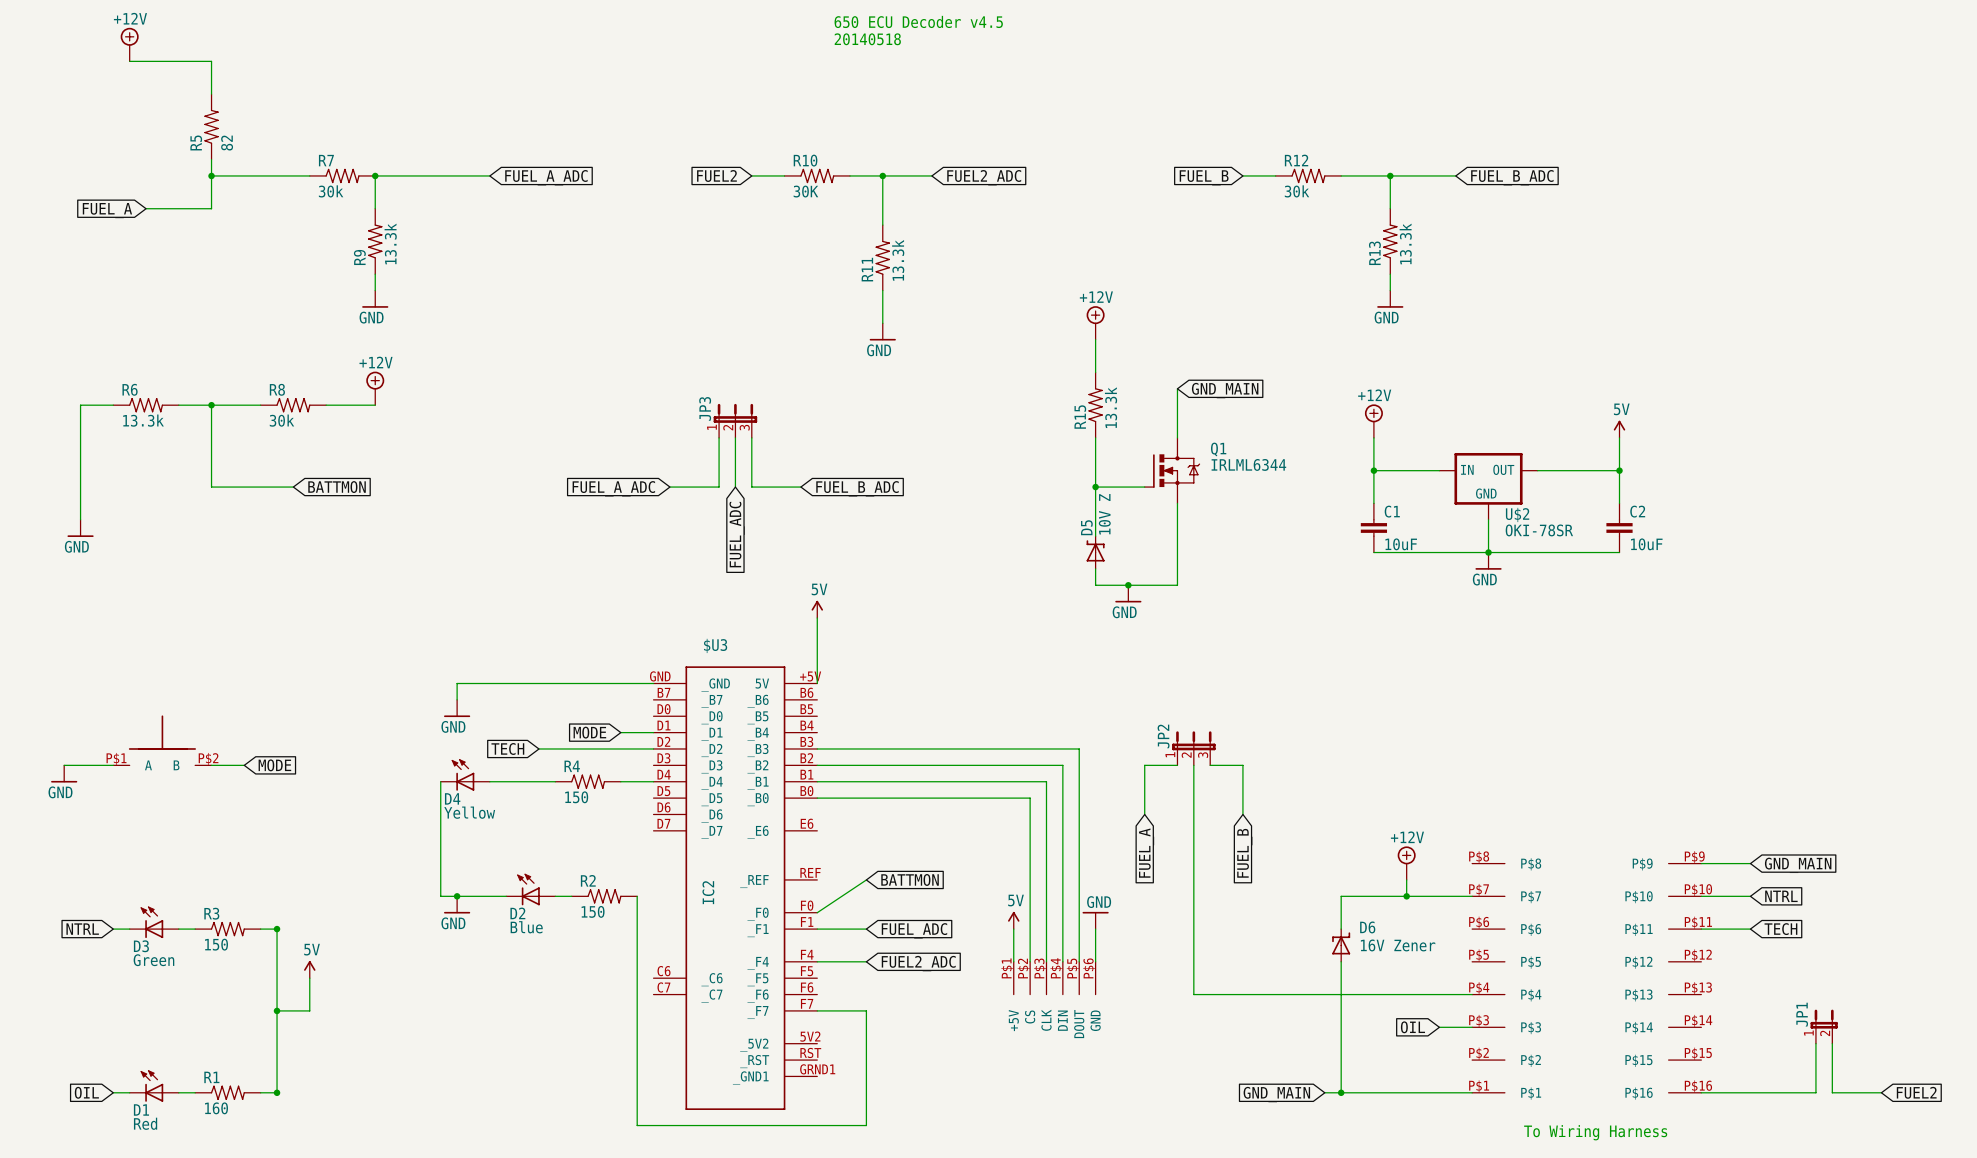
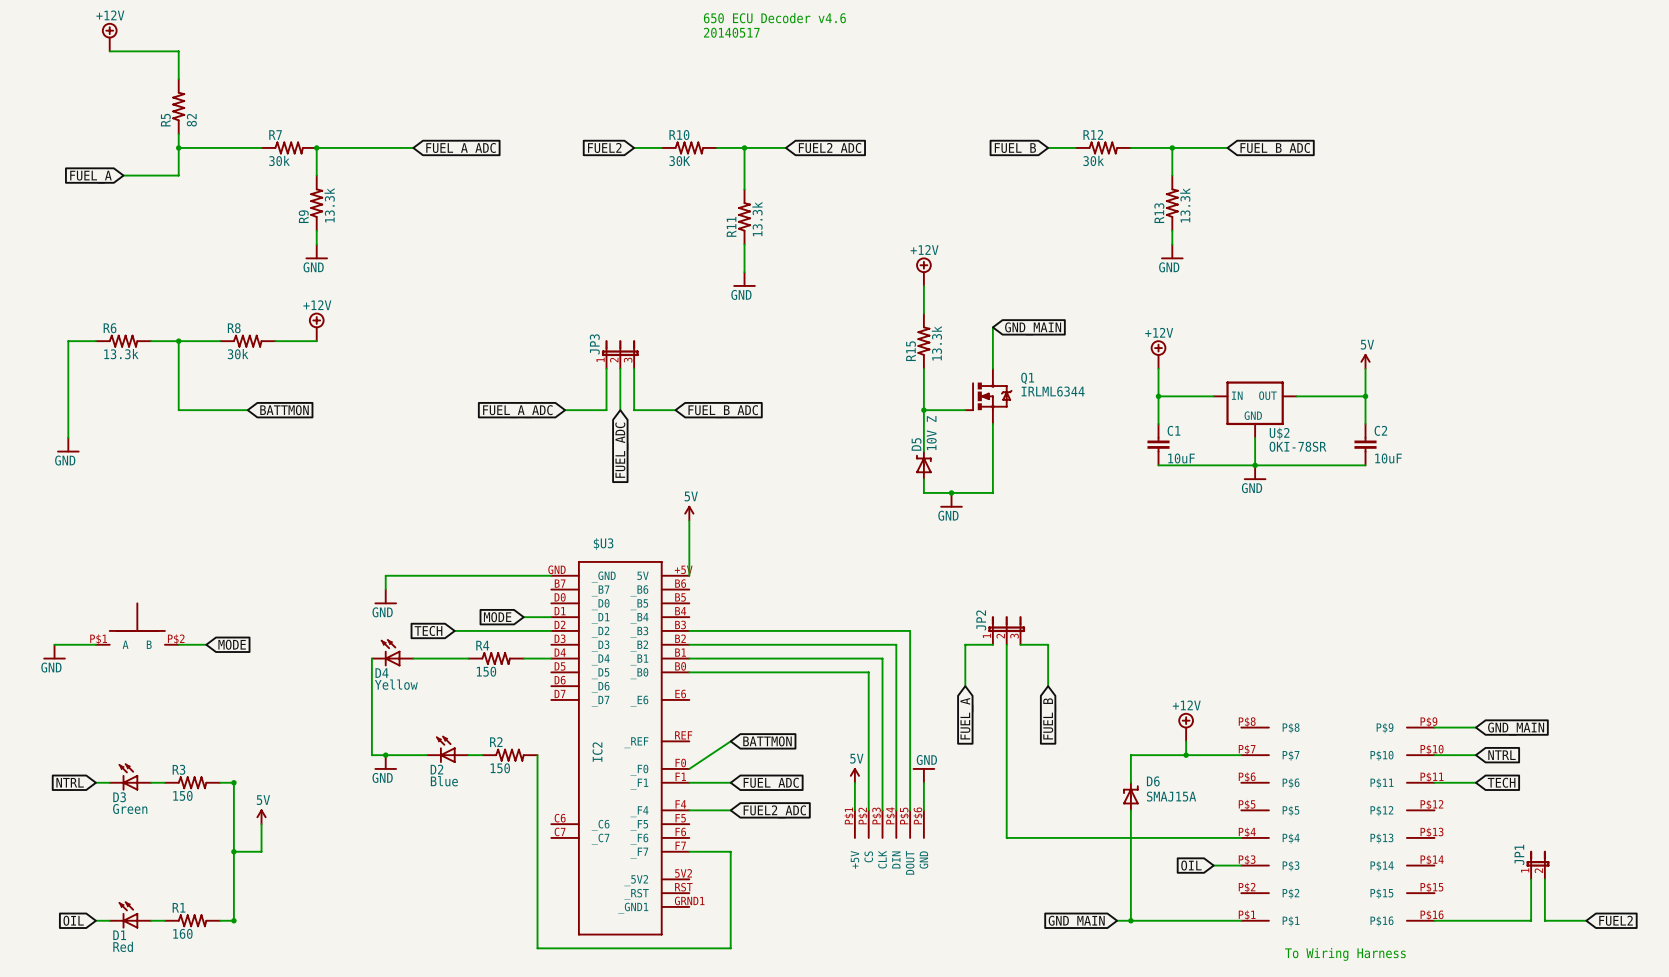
text: 650 ECU Decoder v4.5 (918, 21) -> 650 ECU Decoder v4.6 (774, 18)
text: 20140518 (867, 39) -> 20140517 (731, 32)
D6 value: 16V Zener (1398, 945) -> SMAJ15A (1171, 796)

